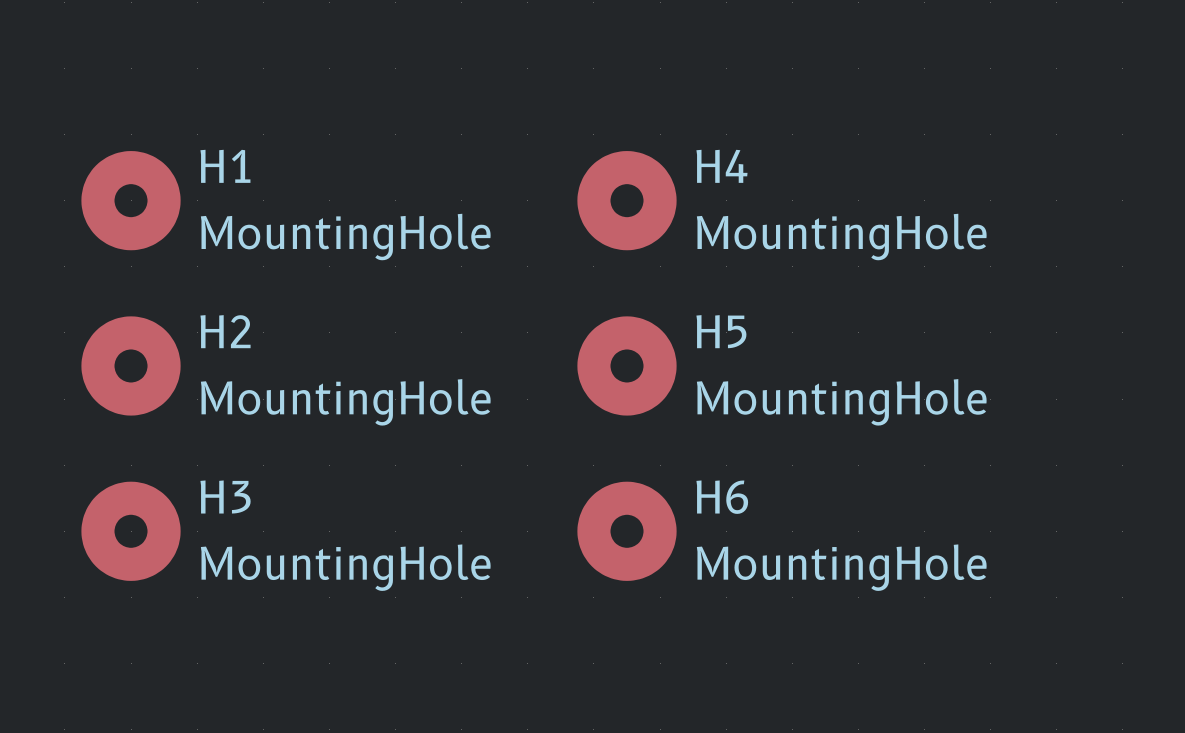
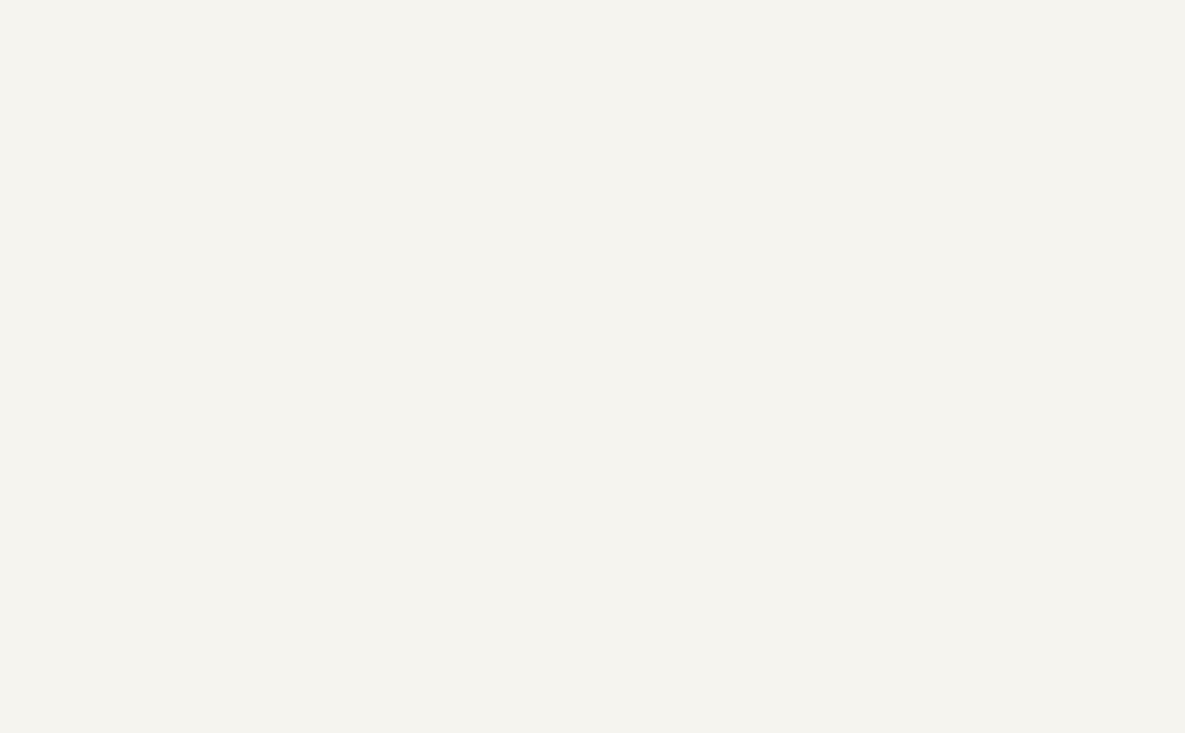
H1: MountingHole (131, 200) -> none
H4: MountingHole (627, 200) -> none
H2: MountingHole (131, 365) -> none
H5: MountingHole (627, 365) -> none
H3: MountingHole (131, 531) -> none
H6: MountingHole (627, 531) -> none

